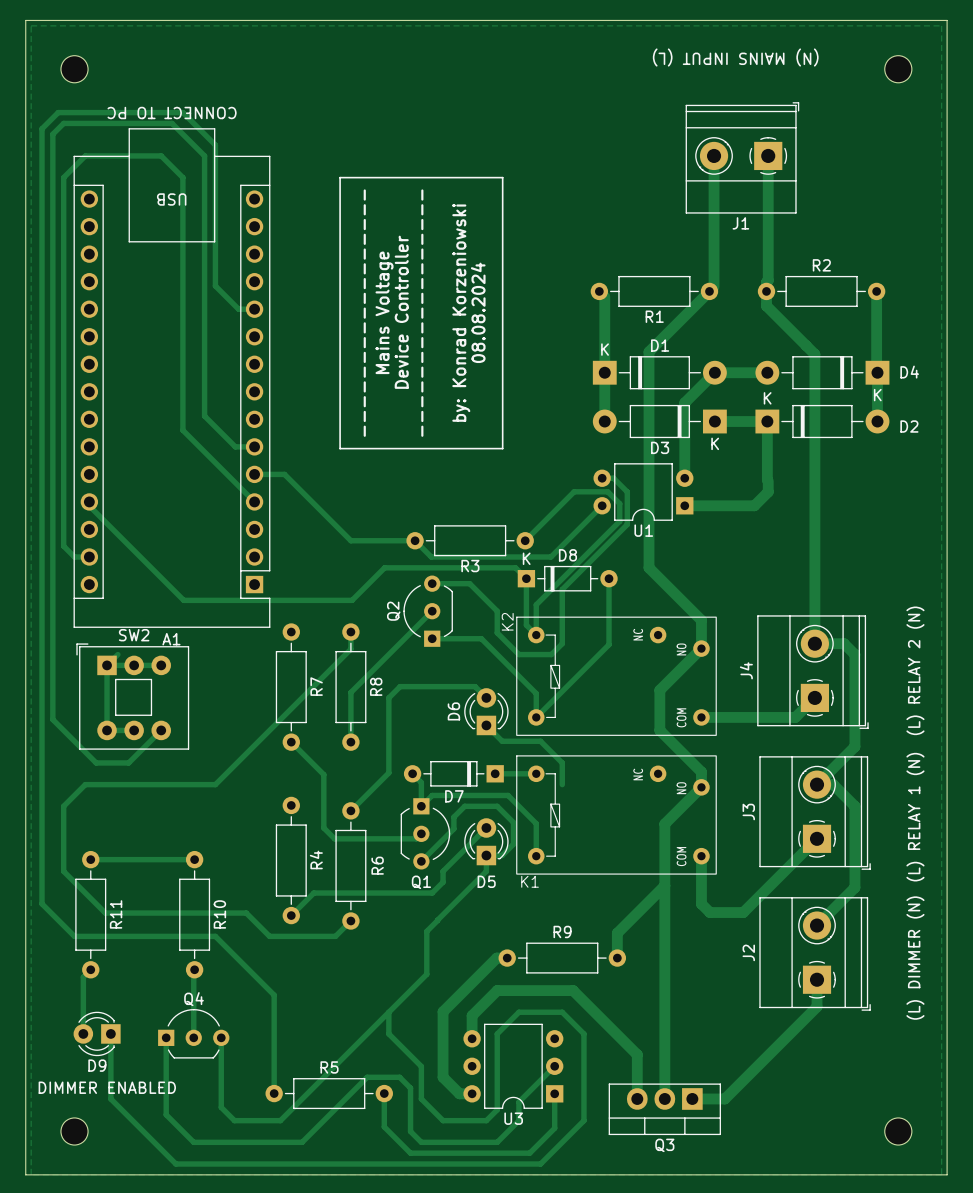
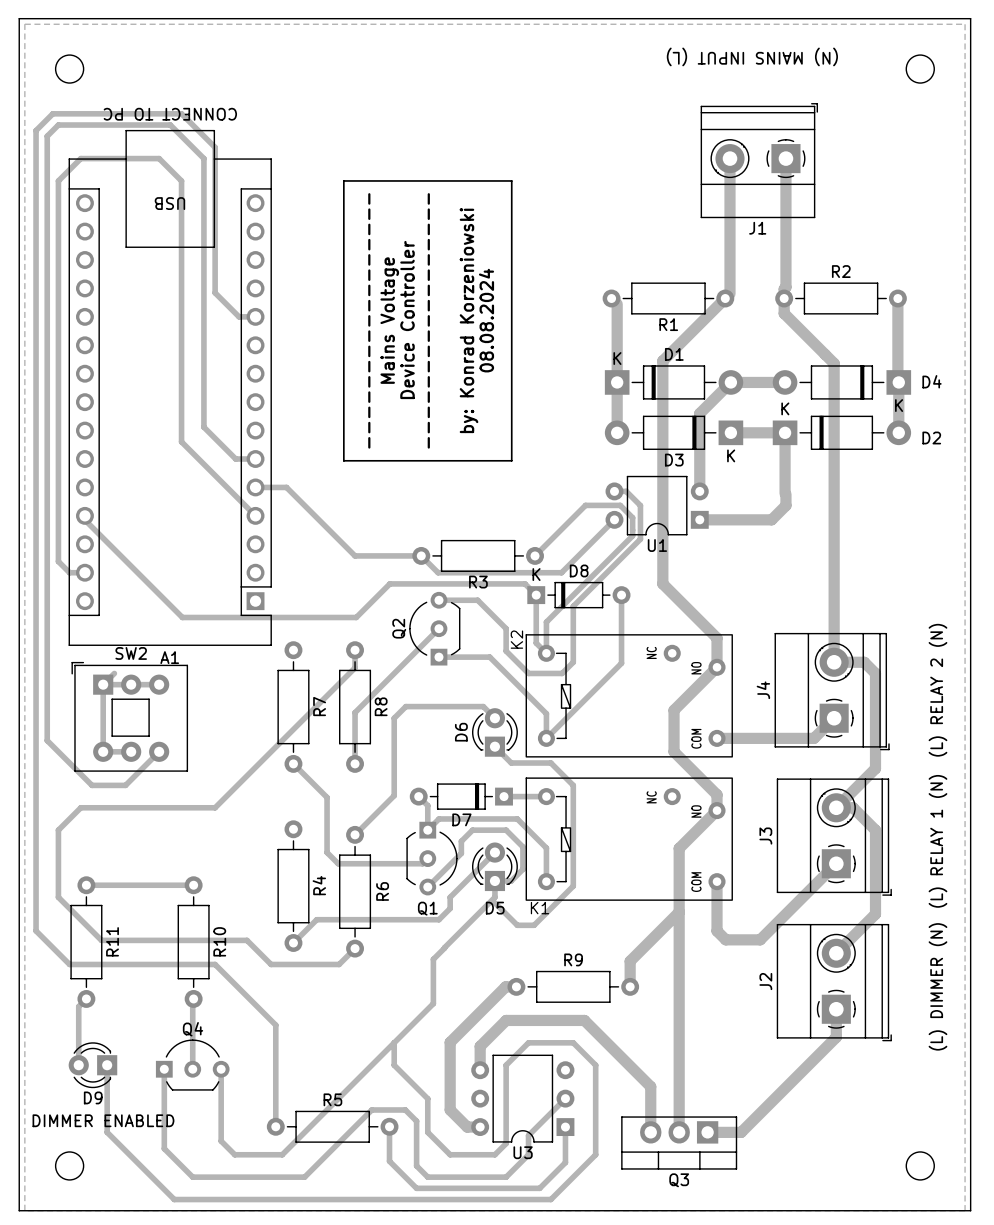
track: none -> (573, 807) (573, 886) (534, 925) (517, 925) (494, 902)

